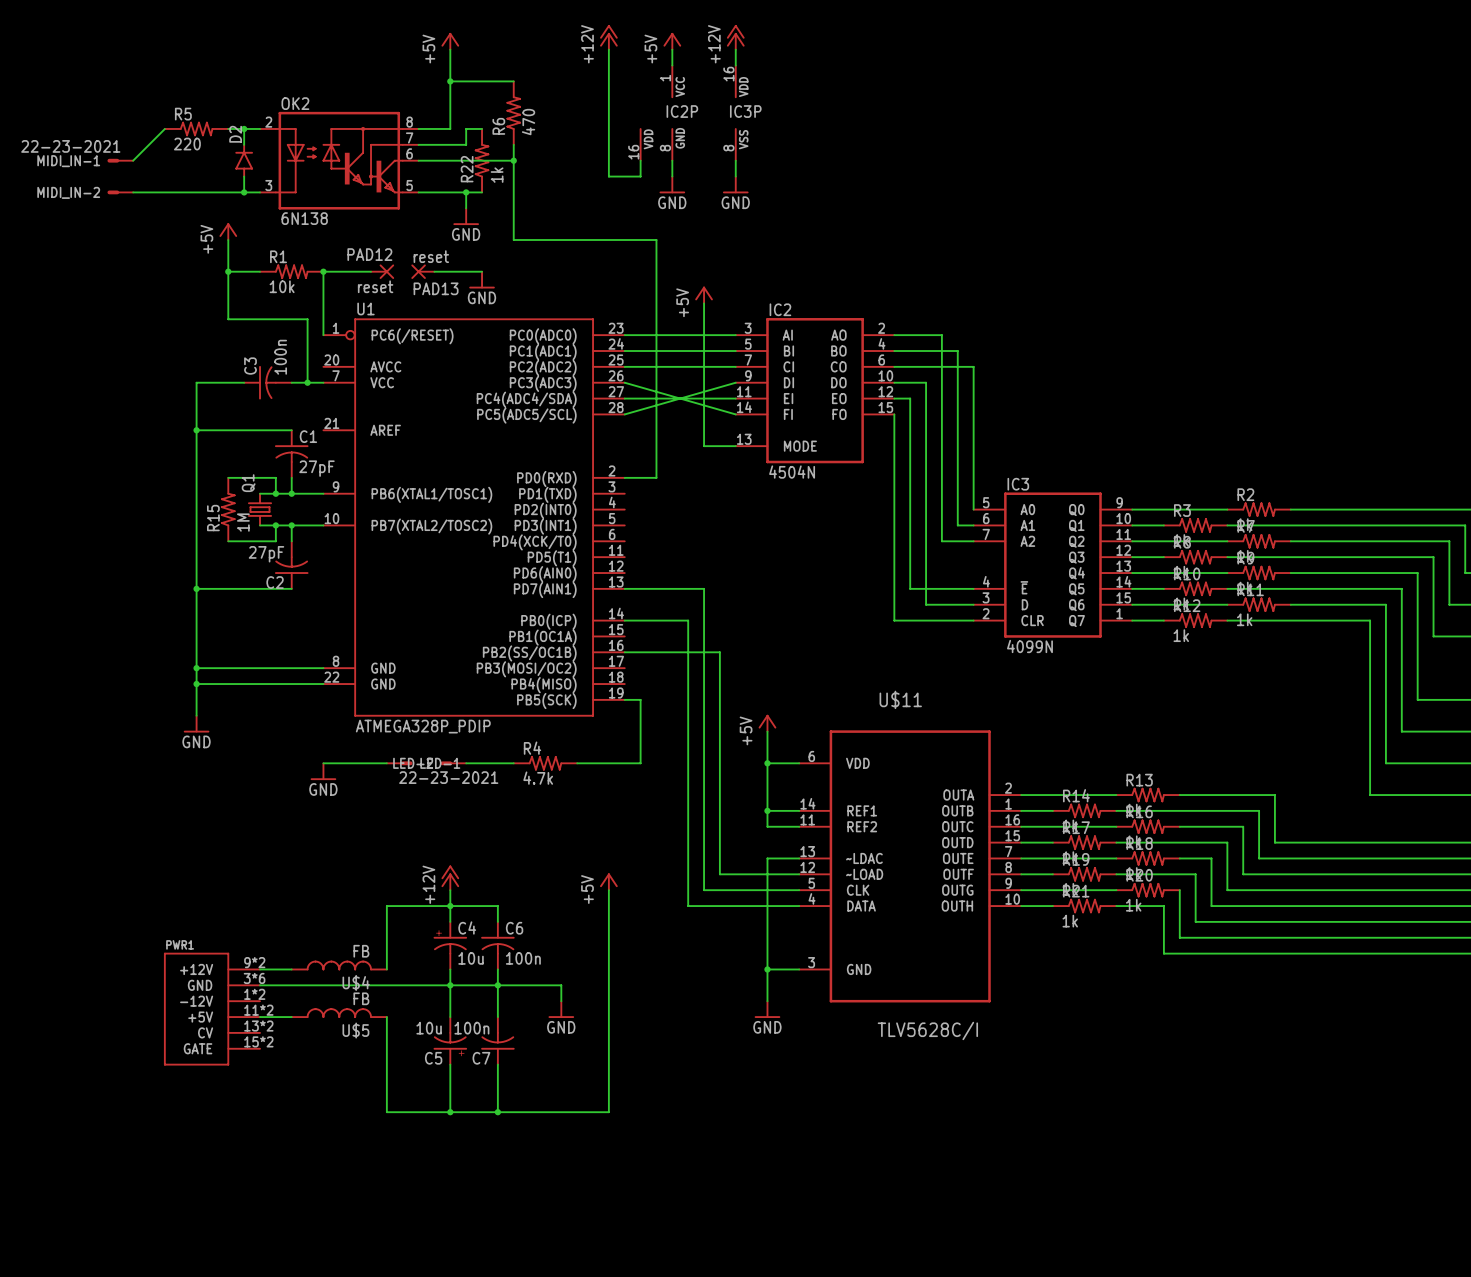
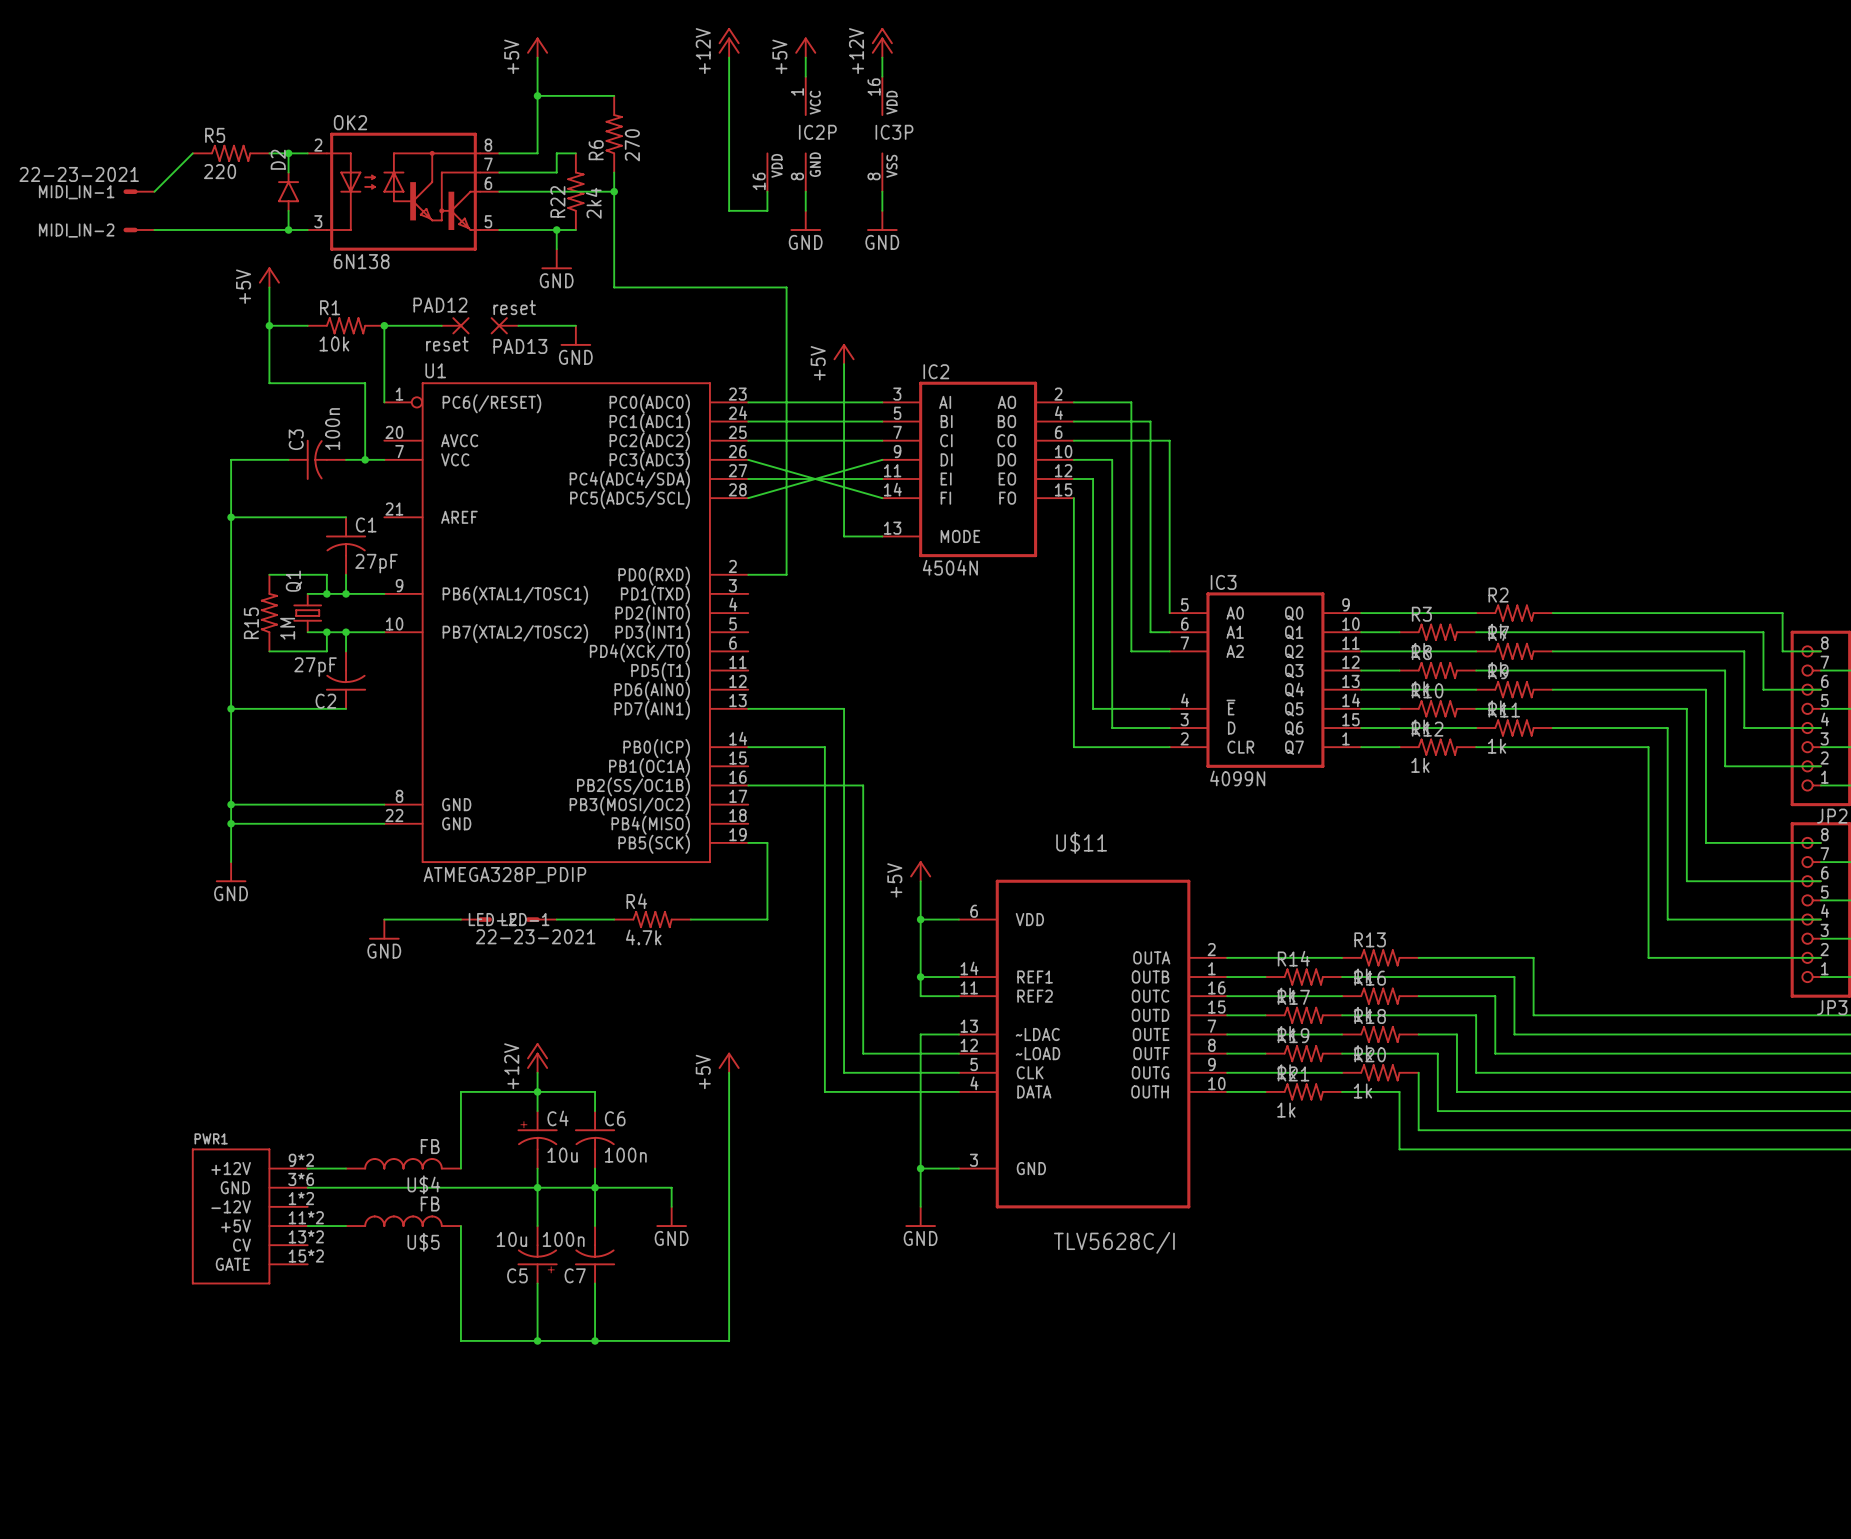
R6 value: 470 (528, 122) -> 270 (632, 145)
R22 value: 1k (497, 175) -> 2k4 (593, 203)

